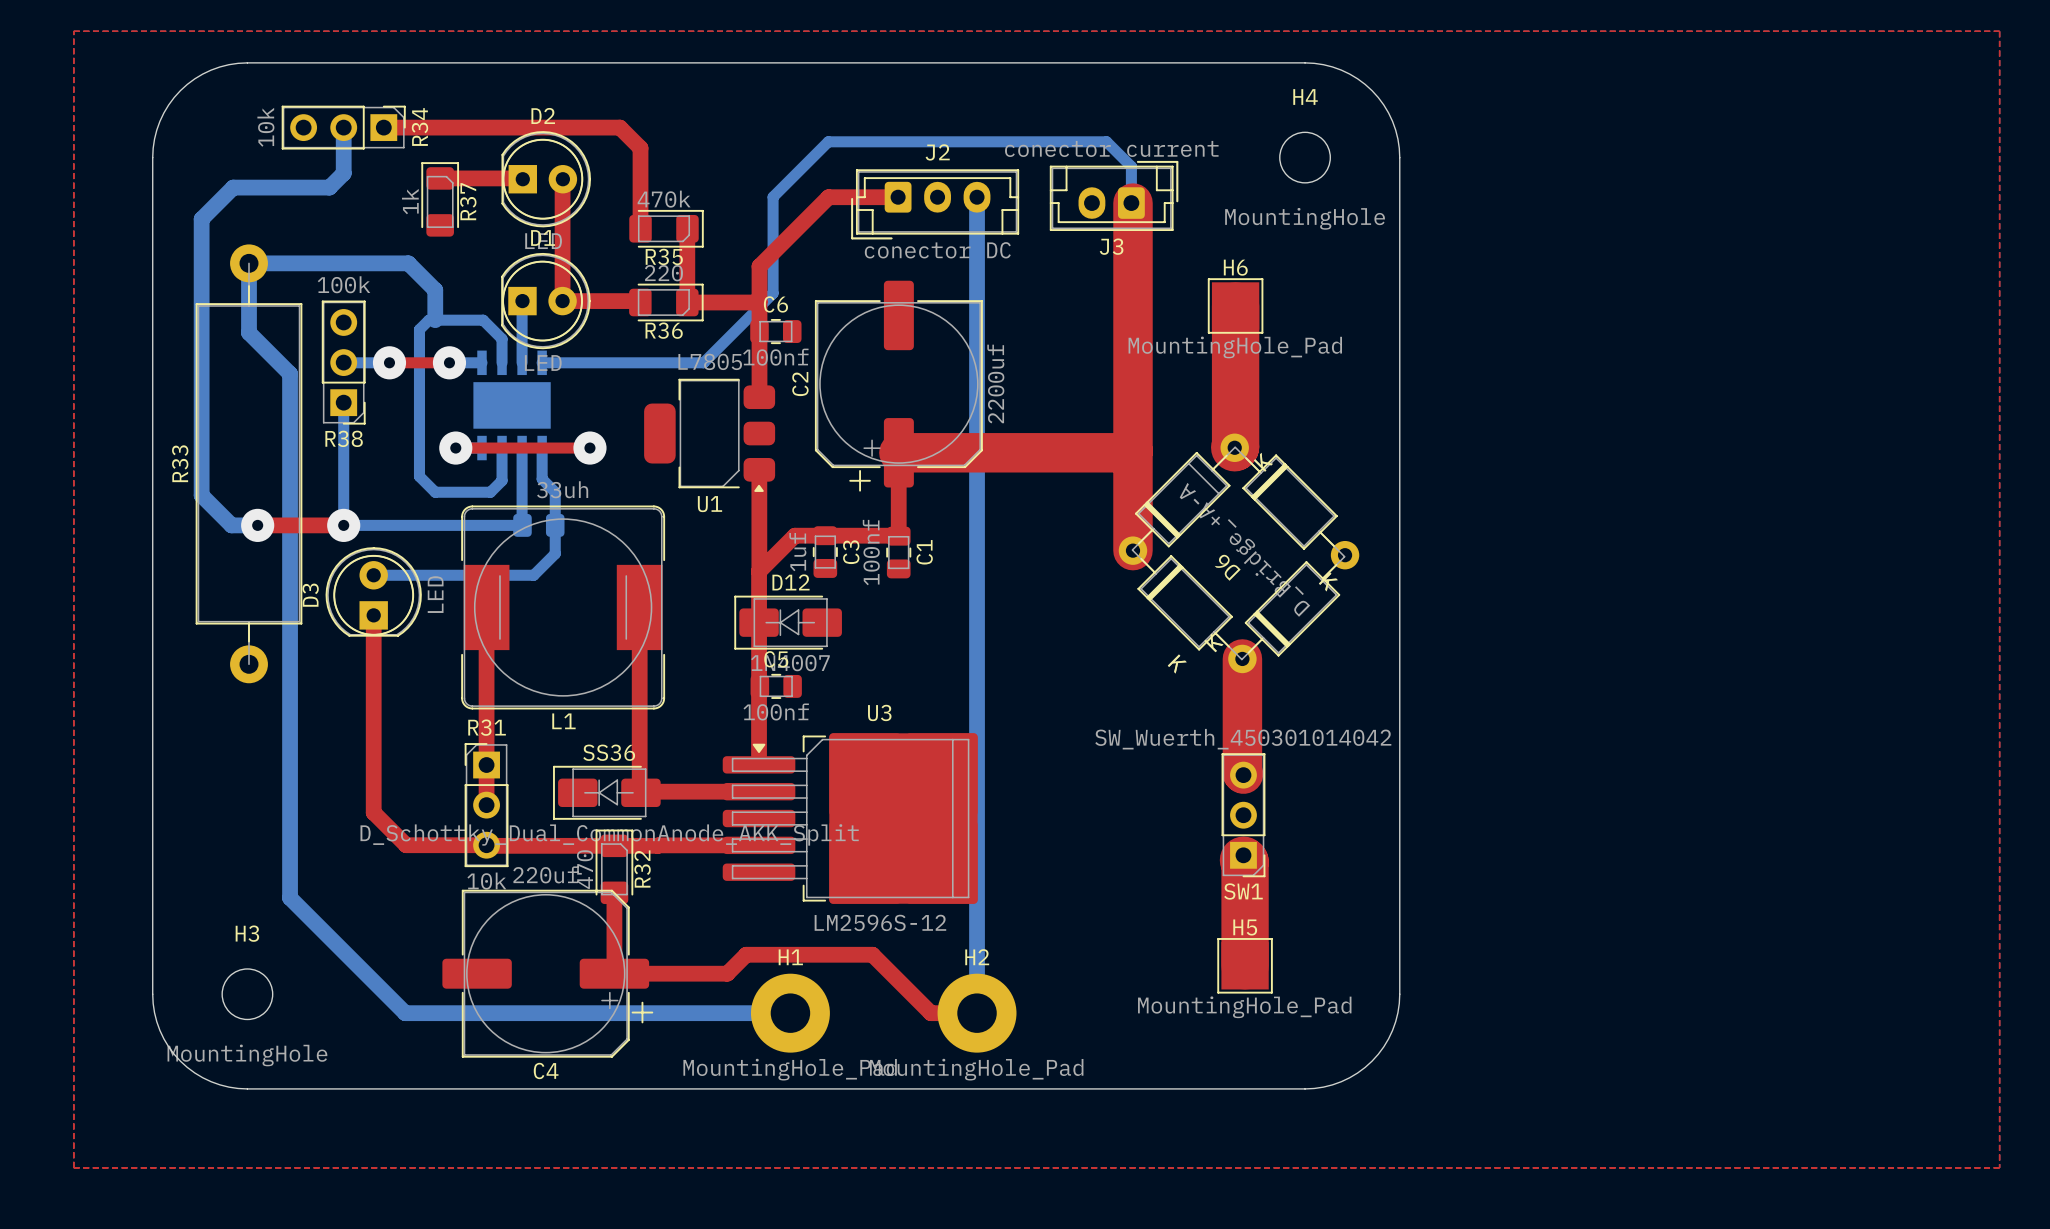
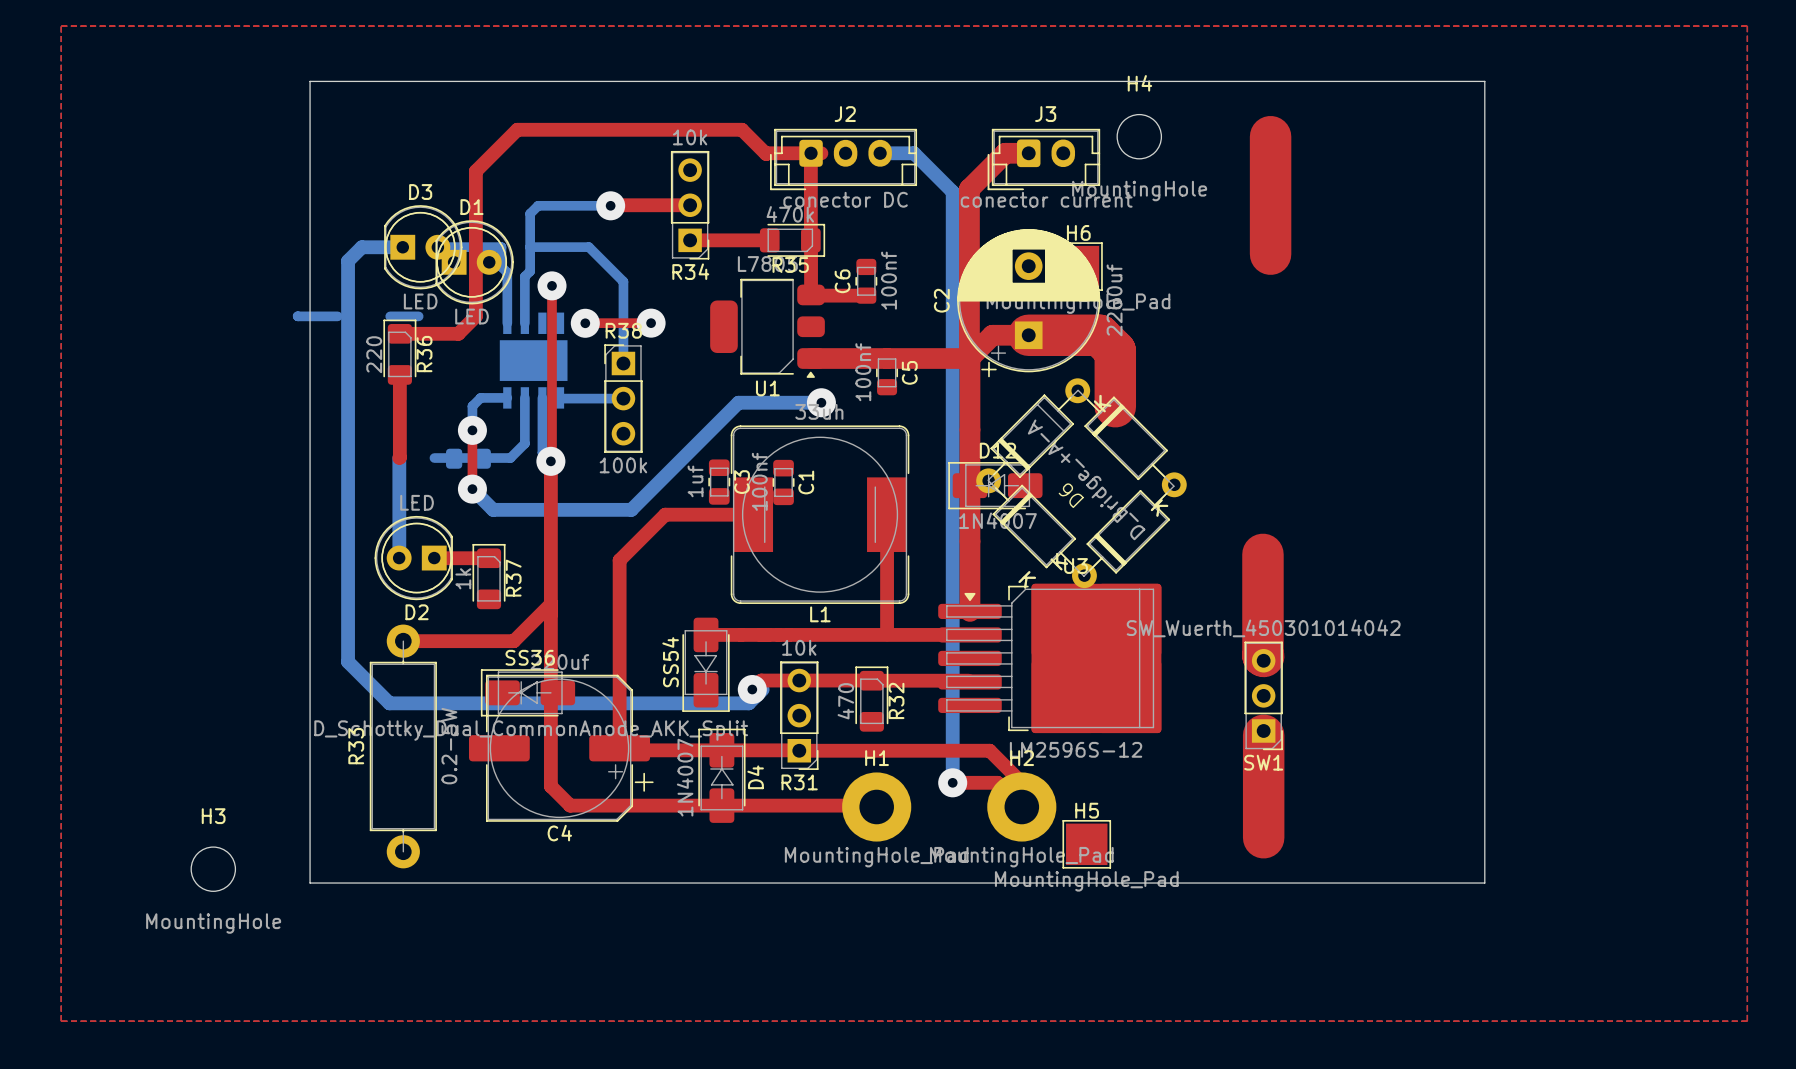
board edge: (247, 62) (1305, 62) (1323, 64) (1341, 70) (1365, 84) (1378, 97) (1392, 121) (1397, 139) (1399, 157) (1399, 994) (1397, 1012) (1392, 1030) (1378, 1054) (1365, 1067) (1349, 1077) (1332, 1084) (1305, 1088) (247, 1088) (219, 1084) (202, 1077) (187, 1067) (168, 1046) (159, 1030) (154, 1012) (152, 994) (153, 148) (159, 121) (168, 104) (180, 90) (194, 78) (211, 70) (228, 64) (247, 62) -> (310, 81) (310, 883) (1484, 883) (1484, 81) (310, 81)
bottom track: (343, 127) (343, 173) (329, 187) (233, 187) (201, 219) (201, 495) (231, 525) (257, 525) -> none
R34 rotation: 0° (343, 127) -> 90° clockwise (690, 205)
R34 position: (343, 127) -> (690, 205)
top track: (383, 127) (619, 127) (640, 148) (640, 228) -> none
top track: none -> (1270, 136) (1270, 254)
top track: none -> (810, 153) (810, 240)
top track: none -> (821, 153) (766, 153) (741, 129) (517, 129) (475, 171) (475, 316) (458, 333) (399, 333)
bottom track: none -> (880, 153) (914, 153) (952, 191) (952, 782)
top track: none -> (1028, 153) (1005, 153) (969, 189) (969, 357)
top track: (440, 178) (522, 179) -> none
D2 rotation: 0° (546, 179) -> 180° (413, 558)
D2 position: (546, 179) -> (413, 558)
top track: (562, 179) (562, 301) (640, 302) -> none
J3 rotation: 0° (1114, 195) -> 180° (1043, 159)
J3 position: (1114, 195) -> (1043, 159)
top track: (898, 197) (828, 197) (759, 266) (759, 397) -> none
bottom track: (977, 197) (977, 1013) -> none
R37 position: (440, 199) -> (488, 576)
bottom track: (1131, 203) (1131, 166) (1106, 141) (828, 141) (773, 197) (773, 293) (703, 362) (542, 362) -> none
top track: (1133, 203) (1132, 550) -> none
J2 position: (935, 204) -> (843, 159)
R35 position: (666, 228) -> (792, 240)
top track: (687, 228) (687, 302) (759, 301) -> none
top track: none -> (690, 205) (610, 205)
bottom track: none -> (610, 205) (538, 205) (530, 213) (530, 271) (524, 276) (524, 323)
via: none -> (610, 205)
R33 footprint: [195, 244, 303, 684] -> [369, 624, 437, 869]
top track: none -> (690, 240) (769, 240)
top track: none -> (811, 240) (811, 295) (866, 295)
C2 footprint: [814, 280, 983, 492] -> [957, 229, 1101, 378]
bottom track: none -> (402, 247) (361, 247) (348, 261) (348, 661) (389, 703) (748, 703) (762, 689)
bottom track: none -> (438, 247) (501, 247) (501, 266) (507, 272) (507, 323)
bottom track: none -> (530, 247) (588, 247) (623, 281) (623, 363)
bottom track: (522, 301) (522, 362) -> none
R36 rotation: 0° (666, 302) -> 90° counterclockwise (399, 352)
R36 position: (666, 302) -> (399, 352)
C6 name position: C6 (775, 304) -> C6 (842, 281)
top track: (1235, 305) (1234, 447) -> none
bottom track: (435, 320) (435, 290) (408, 263) (249, 263) (249, 332) (290, 373) (290, 897) (405, 1013) (790, 1013) -> none
via: none -> (552, 285)
C6 rotation: 0° (775, 331) -> 90° clockwise (866, 281)
C6 position: (775, 331) -> (866, 281)
top track: none -> (557, 291) (552, 285) (550, 786) (570, 805) (876, 807)
C6 value position: 100nf (775, 357) -> 100nf (889, 280)
R38 rotation: 0° (343, 362) -> 180° (623, 398)
R38 position: (343, 362) -> (623, 398)
top track: (389, 362) (449, 362) -> none
via: (389, 362) -> none
via: (449, 362) -> none
bottom track: (502, 362) (502, 339) (483, 320) (428, 320) (419, 329) (419, 476) (435, 492) (490, 492) (502, 480) (502, 448) -> none
top track: none -> (585, 323) (651, 323)
via: none -> (585, 323)
via: none -> (651, 323)
bottom track: (343, 402) (343, 525) (522, 525) (522, 448) -> none
part position: (512, 405) -> (533, 360)
top track: none -> (969, 357) (969, 611)
top track: none -> (811, 358) (969, 358) (992, 335) (1099, 335) (1115, 351) (1115, 406)
top track: none -> (399, 374) (399, 458)
U1 position: (709, 435) -> (767, 328)
top track: (455, 448) (589, 448) -> none
via: (455, 448) -> none
bottom track: (542, 448) (542, 479) (555, 492) (555, 553) (533, 575) (373, 575) -> none
via: (589, 448) -> none
top track: (1133, 451) (1131, 452) (898, 453) -> none
top track: (898, 452) (898, 536) (794, 535) (759, 571) (759, 764) -> none
bottom track: none -> (507, 397) (480, 397) (472, 406) (472, 430)
bottom track: none -> (524, 397) (524, 443) (510, 458) (434, 458)
bottom track: none -> (542, 397) (542, 452) (550, 461)
bottom track: none -> (559, 397) (623, 398)
bottom track: none -> (821, 402) (738, 402) (631, 509) (493, 509) (472, 489)
via: none -> (821, 402)
top track: (759, 469) (759, 571) -> none
top track: none -> (472, 430) (472, 489)
via: none -> (472, 430)
bottom track: none -> (399, 458) (399, 557)
top track: (257, 525) (343, 525) -> none
via: (257, 525) -> none
via: (343, 525) -> none
via: none -> (550, 461)
via: none -> (472, 489)
top track: none -> (753, 514) (665, 514) (619, 560) (619, 748)
top track: none -> (887, 514) (887, 634)
D3 rotation: 0° (373, 591) -> 90° clockwise (423, 247)
D3 position: (373, 591) -> (423, 247)
top track: (486, 607) (486, 805) -> none
L1 position: (563, 607) -> (820, 514)
top track: (640, 608) (639, 607) (639, 791) (759, 791) -> none
top track: (373, 615) (373, 812) (406, 845) (759, 845) -> none
D12 position: (788, 622) -> (995, 485)
top track: none -> (1262, 554) (1263, 656)
top track: none -> (434, 558) (488, 558)
top track: (1242, 658) (1243, 774) -> none
C5 rotation: 0° (776, 686) -> 90° clockwise (887, 372)
C5 position: (776, 686) -> (887, 372)
top track: none -> (550, 604) (513, 641) (403, 641)
top track: none -> (706, 634) (969, 634)
SS54: none -> (706, 664)
top track: none -> (871, 680) (761, 680) (752, 689)
top track: none -> (871, 680) (968, 680)
via: none -> (752, 689)
R31 rotation: 0° (486, 805) -> 180° (799, 715)
R31 position: (486, 805) -> (799, 715)
SW1 position: (1243, 815) -> (1263, 695)
U3 position: (850, 818) -> (1049, 658)
top track: none -> (1263, 735) (1263, 837)
R33 value: none -> 0.2-5W (449, 746)
top track: none -> (621, 750) (798, 750)
top track: none -> (800, 752) (799, 750) (989, 750) (1021, 782) (1021, 807) (997, 782) (952, 782)
top track: (1243, 860) (1245, 861) (1245, 965) -> none
R32 position: (614, 866) -> (871, 699)
D4: none -> 1N4007 (721, 775)
top track: (614, 892) (614, 973) (727, 973) (746, 954) (872, 954) (930, 1013) (977, 1013) -> none
via: none -> (952, 782)
C4 position: (547, 973) -> (561, 748)
H1 position: (790, 1013) -> (876, 807)
H2 position: (977, 1013) -> (1021, 807)

